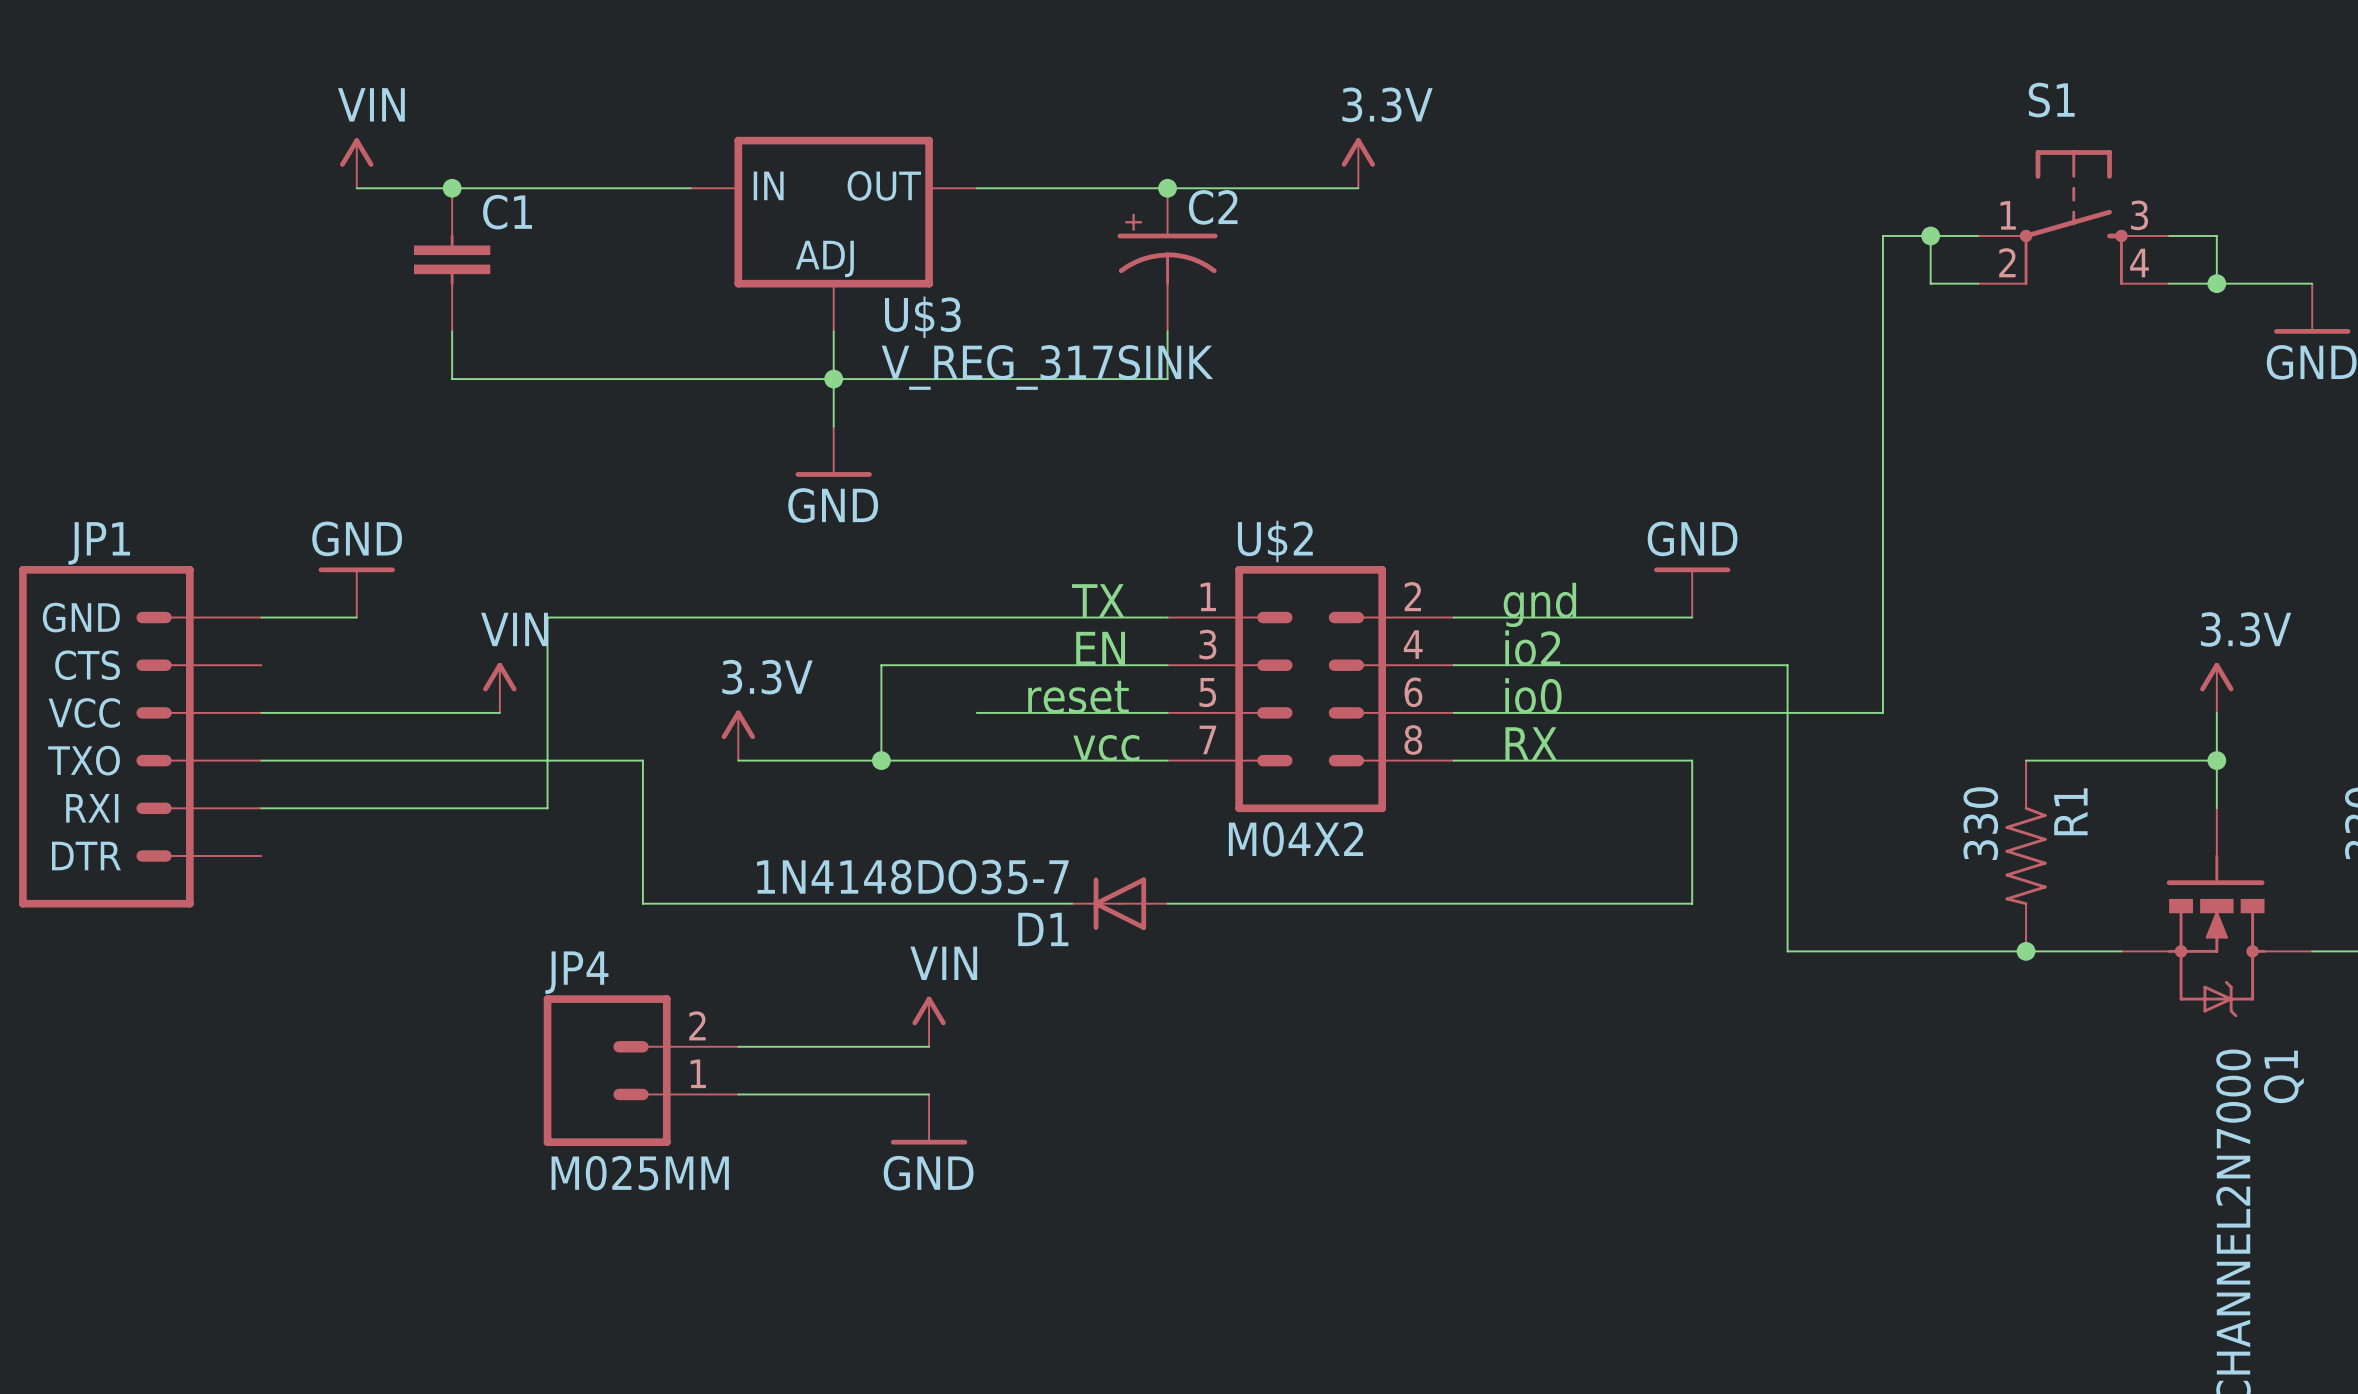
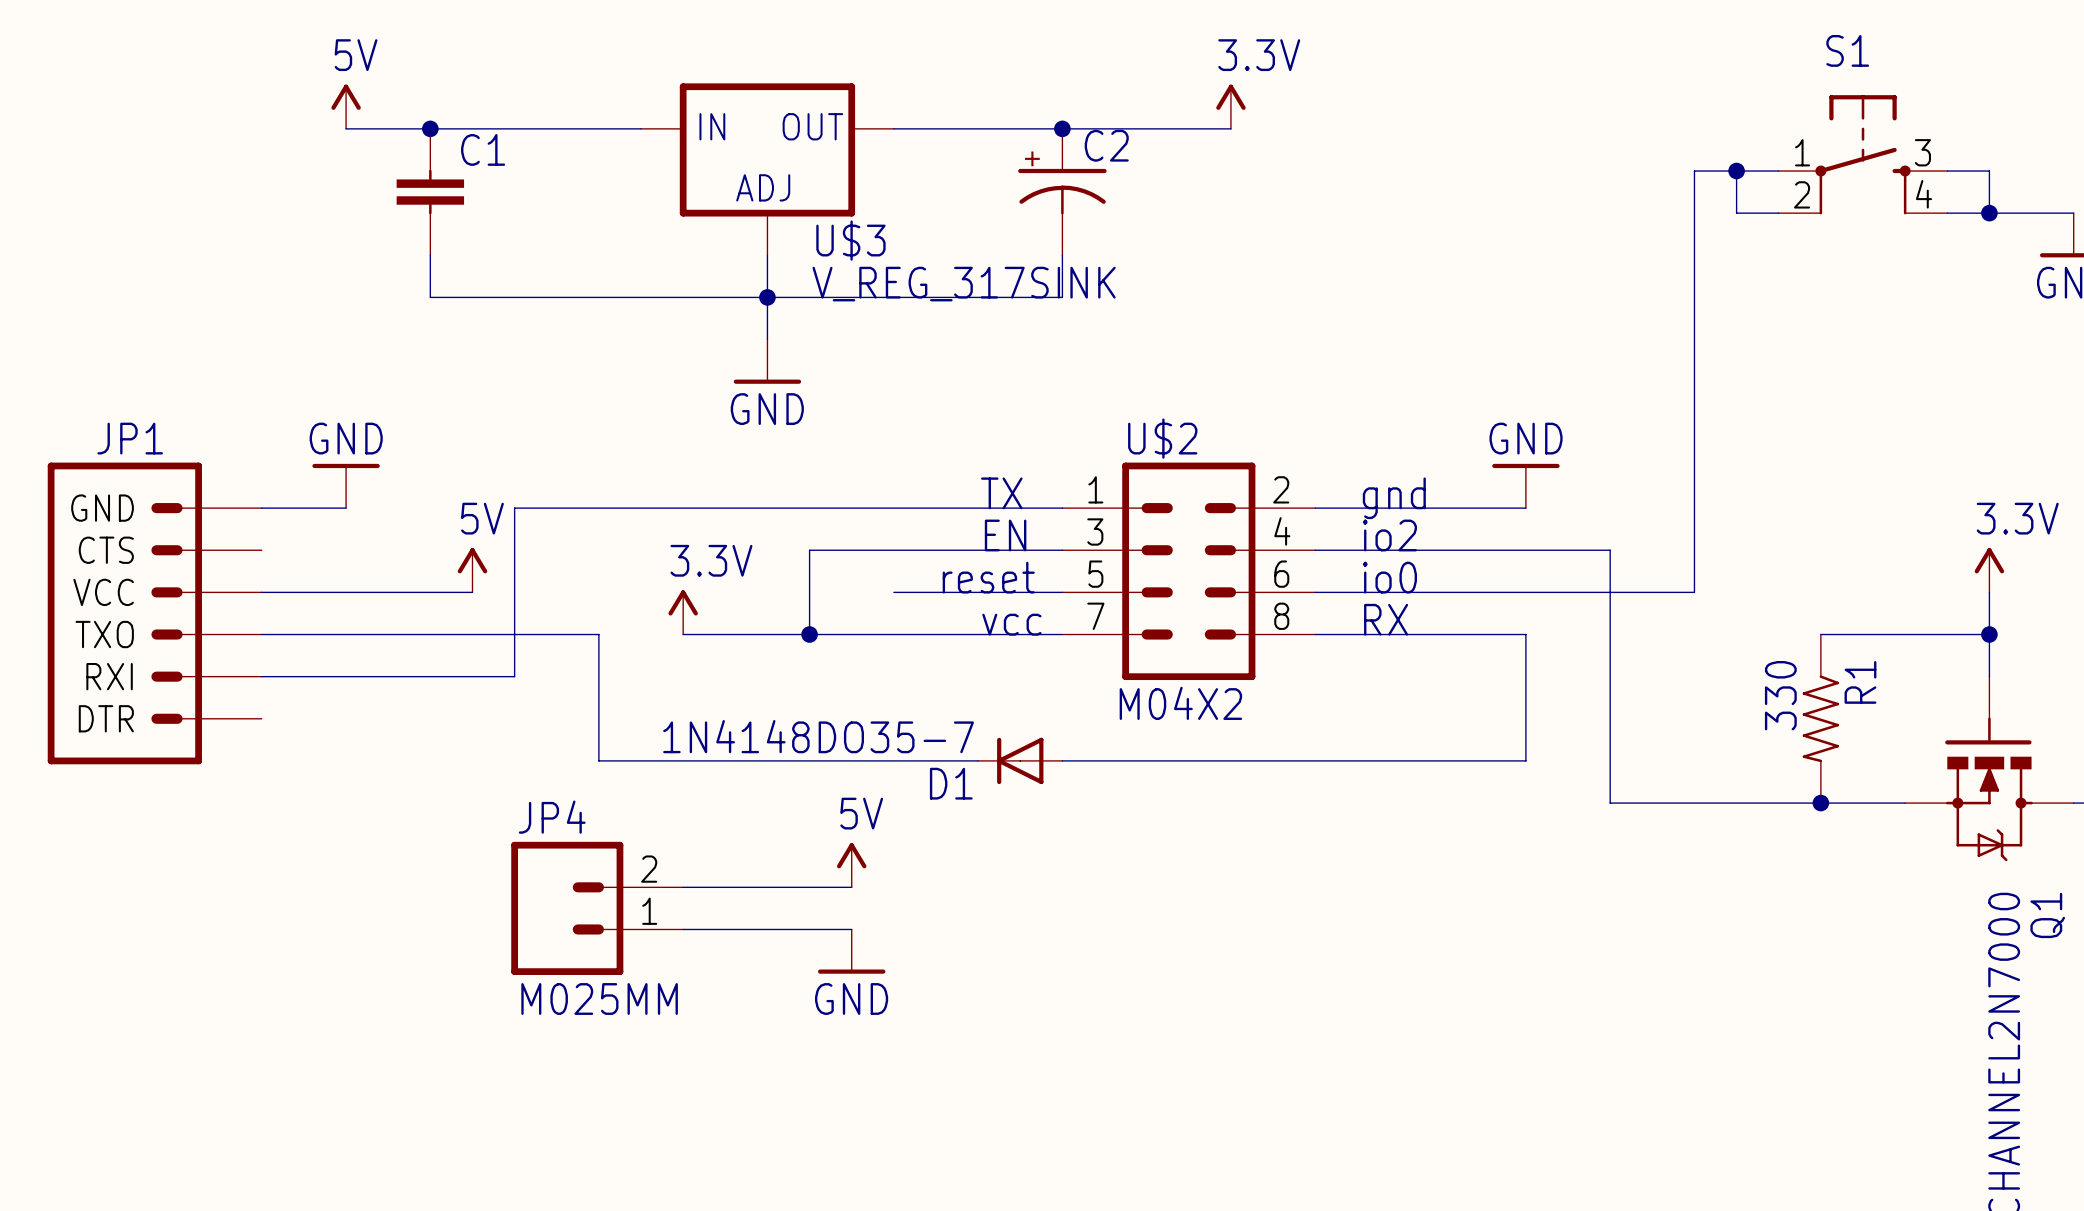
power symbol: VIN (356, 163) -> 5V (346, 106)
power symbol: VIN (499, 687) -> 5V (472, 570)
power symbol: VIN (929, 1021) -> 5V (851, 865)

